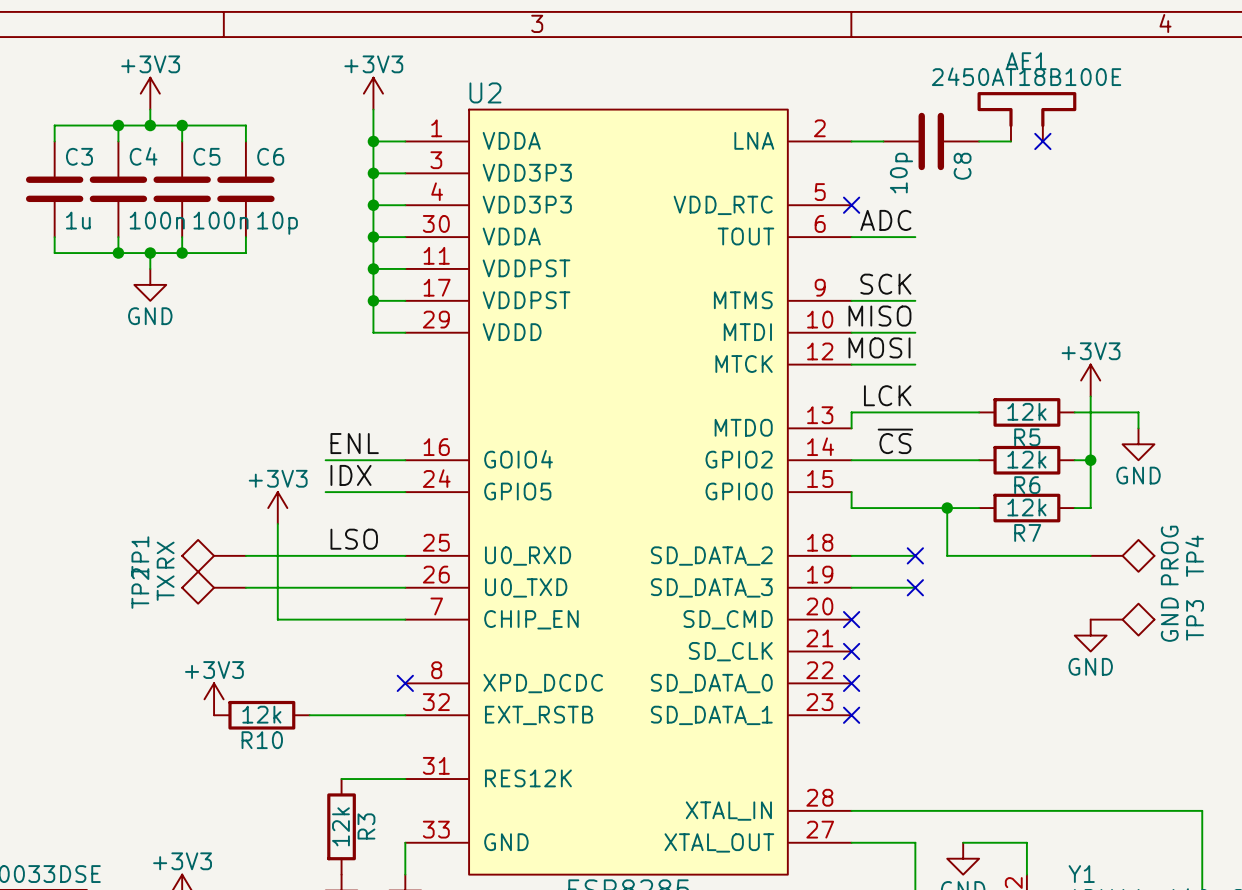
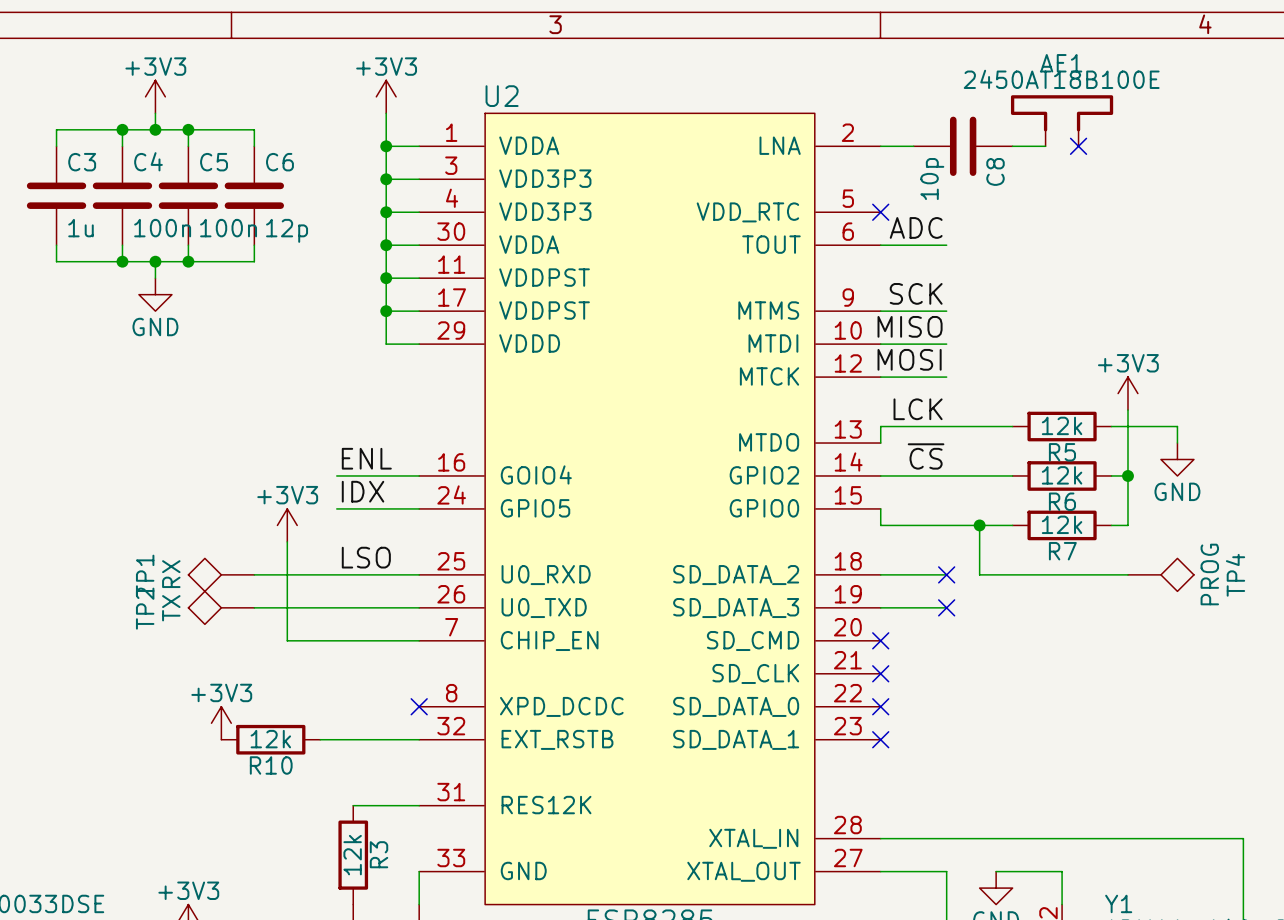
C6 value: 10p (277, 223) -> 12p (287, 230)
TP3: GND (1122, 619) -> none
power symbol: GND (1090, 635) -> none

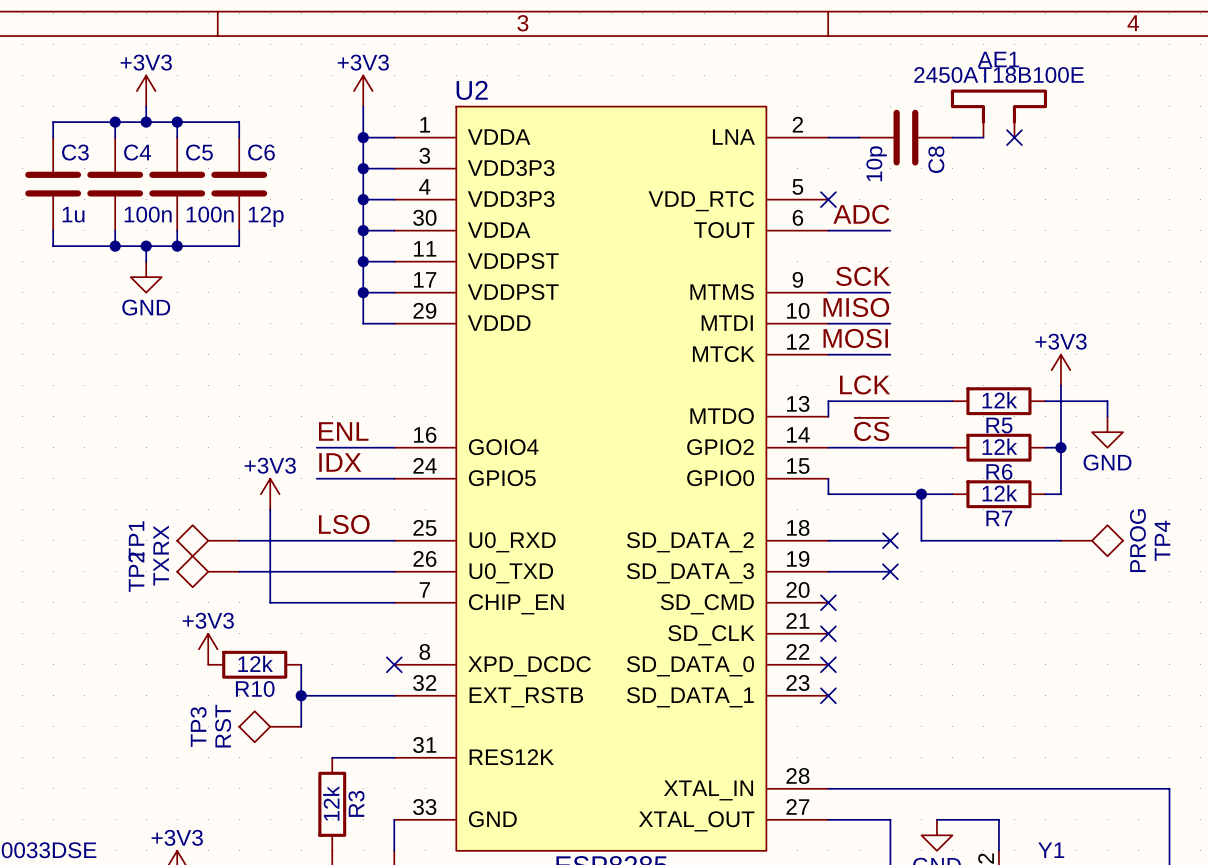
wire: none -> (301, 664) (301, 726)
power symbol position: +3V3 (221, 723) -> +3V3 (208, 649)
R10 position: (270, 739) -> (254, 664)
junction: none -> (301, 695)
TP3: none -> RST (270, 726)

